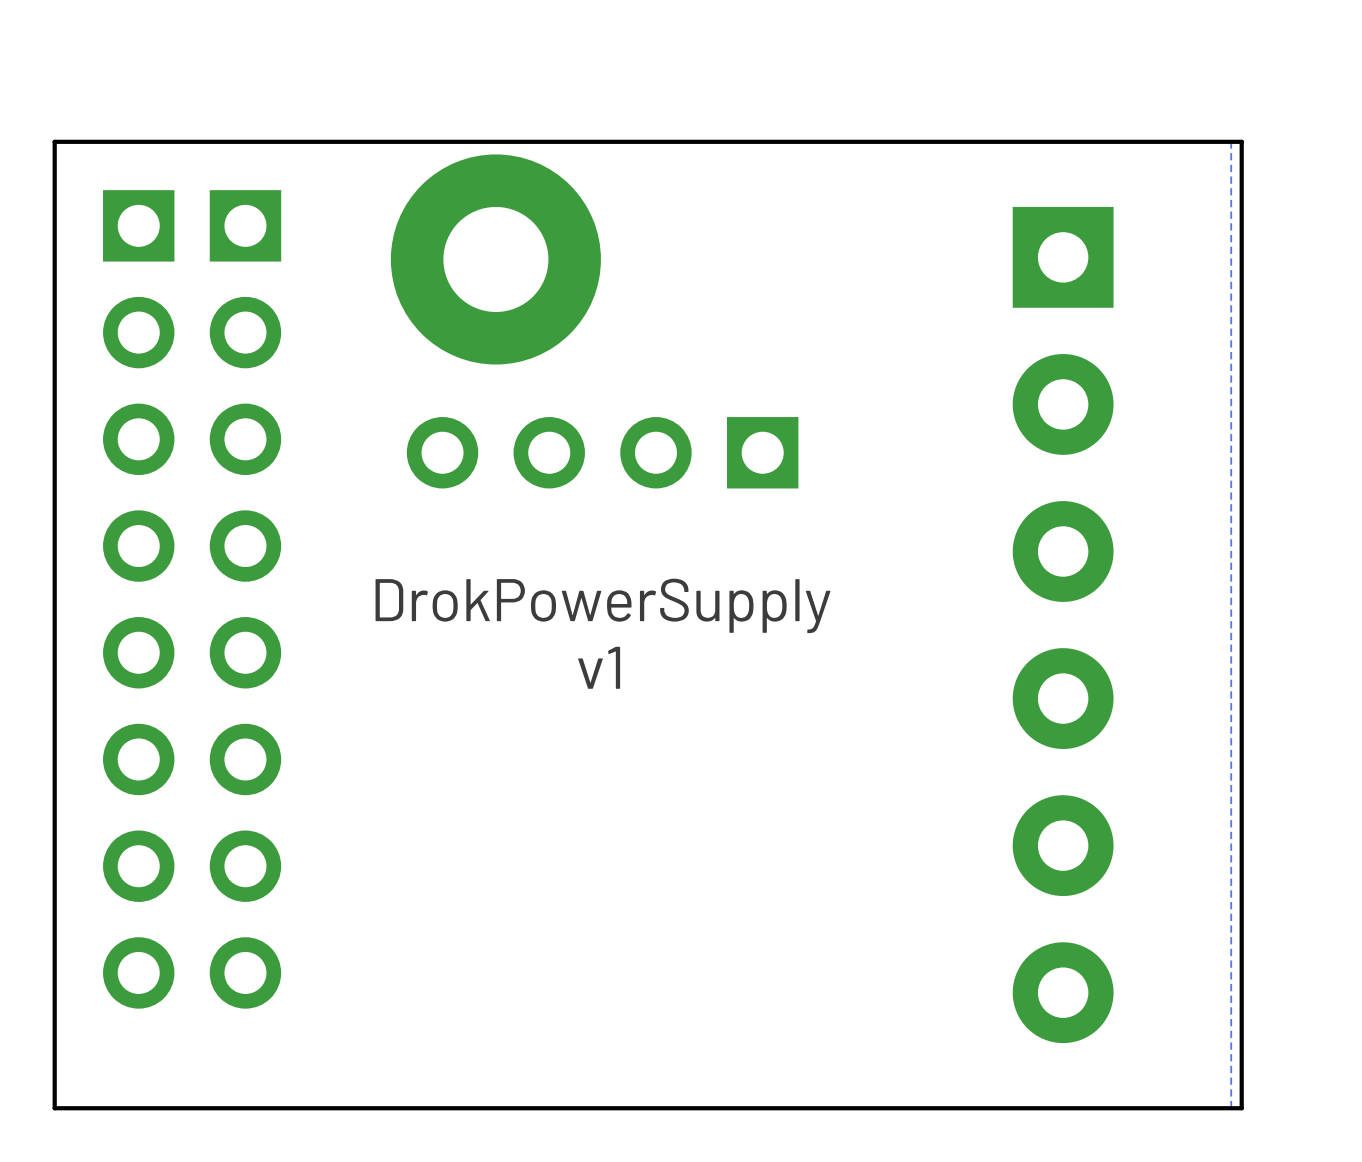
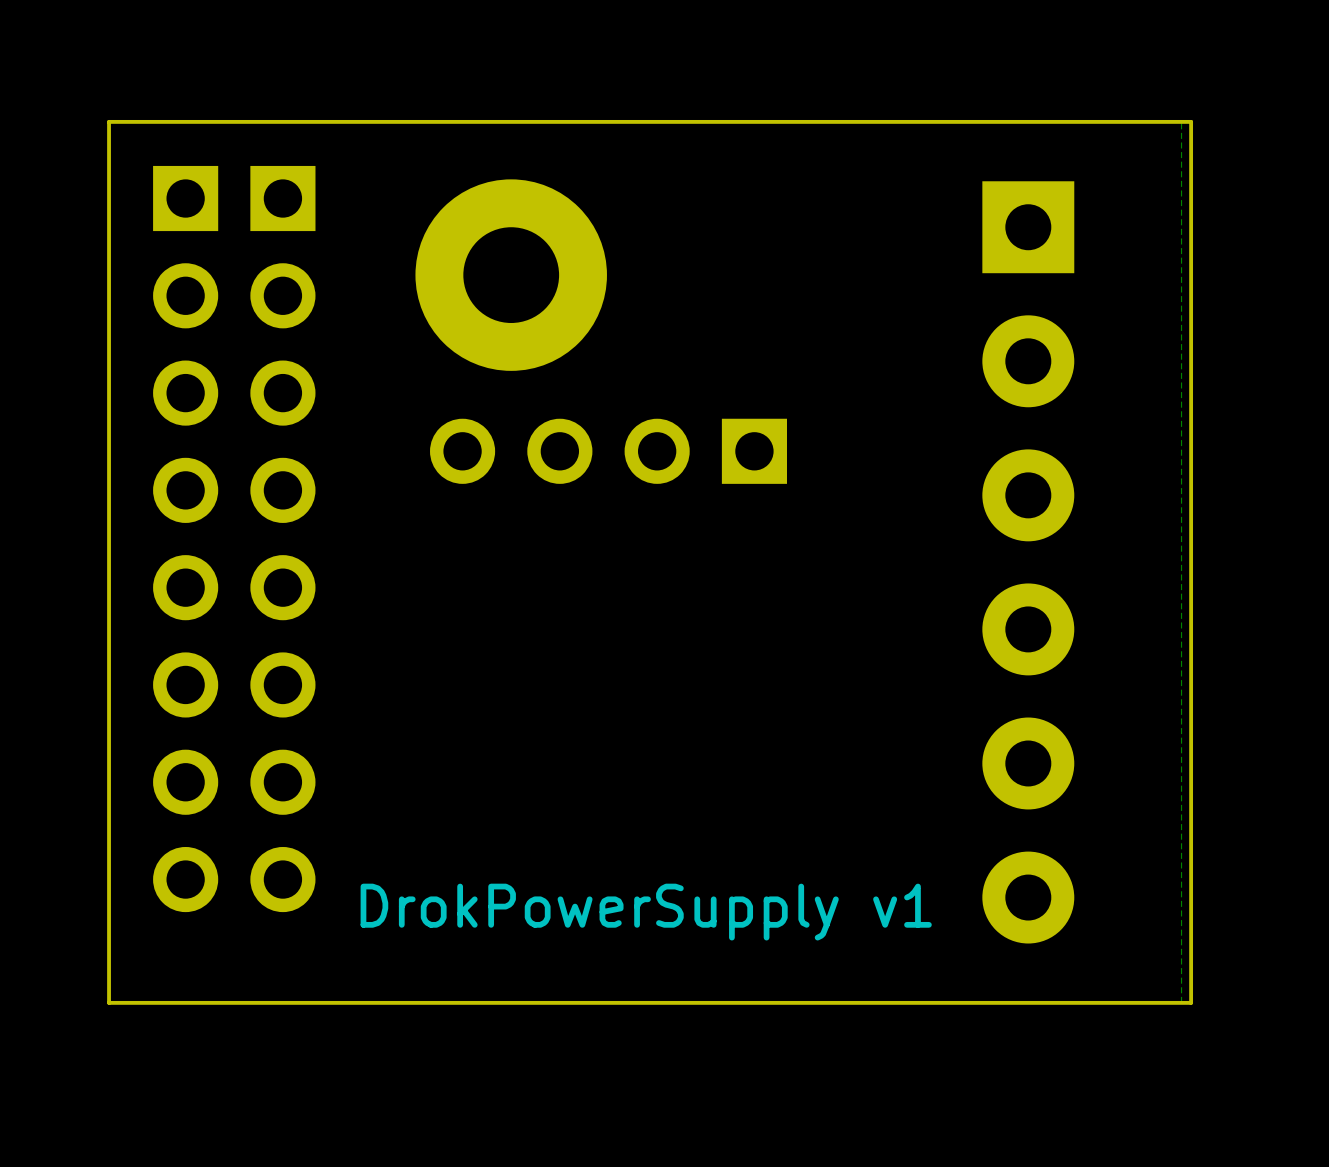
part position: (495, 259) -> (511, 275)
part position: (602, 452) -> (608, 451)
text: DrokPowerSupply (603, 605) -> none
text: v1 (599, 667) -> none
text: none -> DrokPowerSupply v1 (646, 912)

